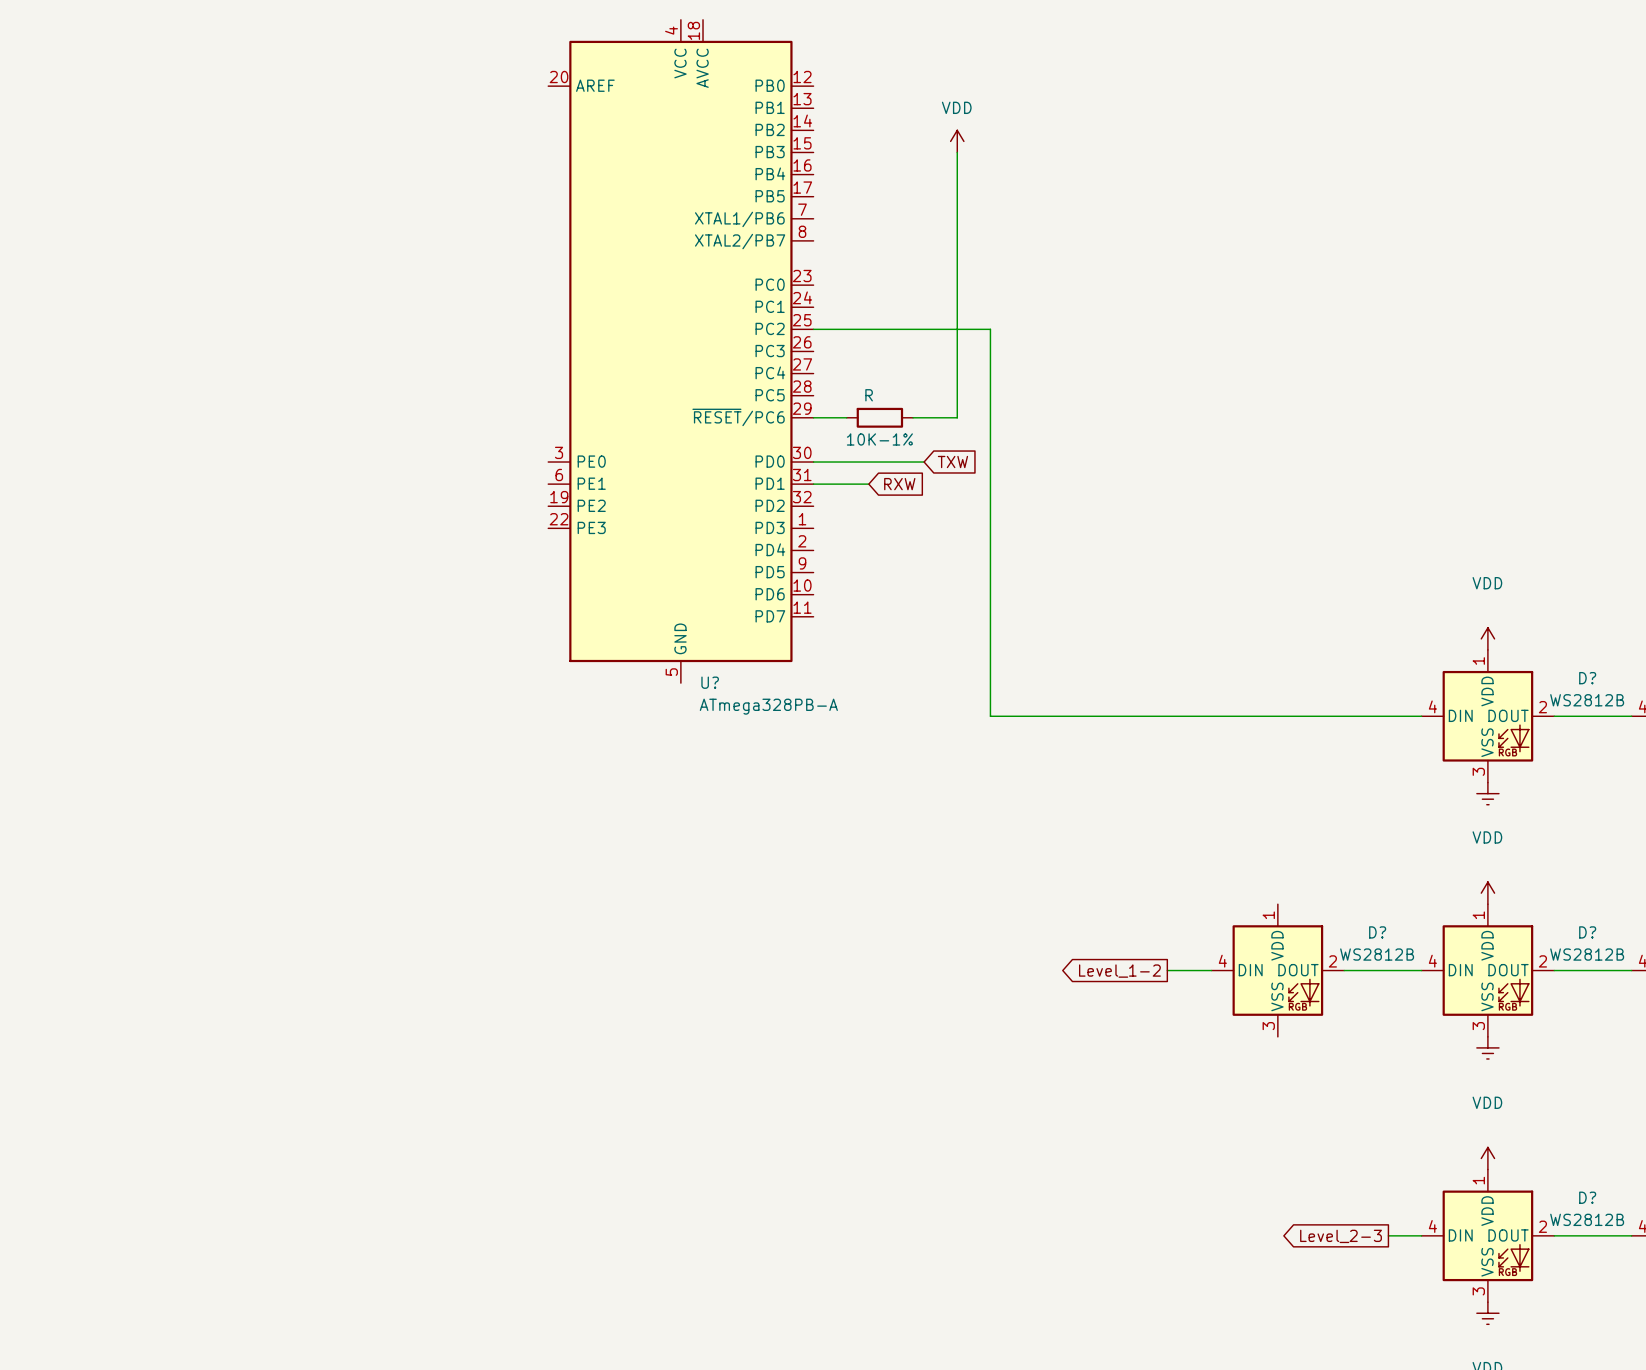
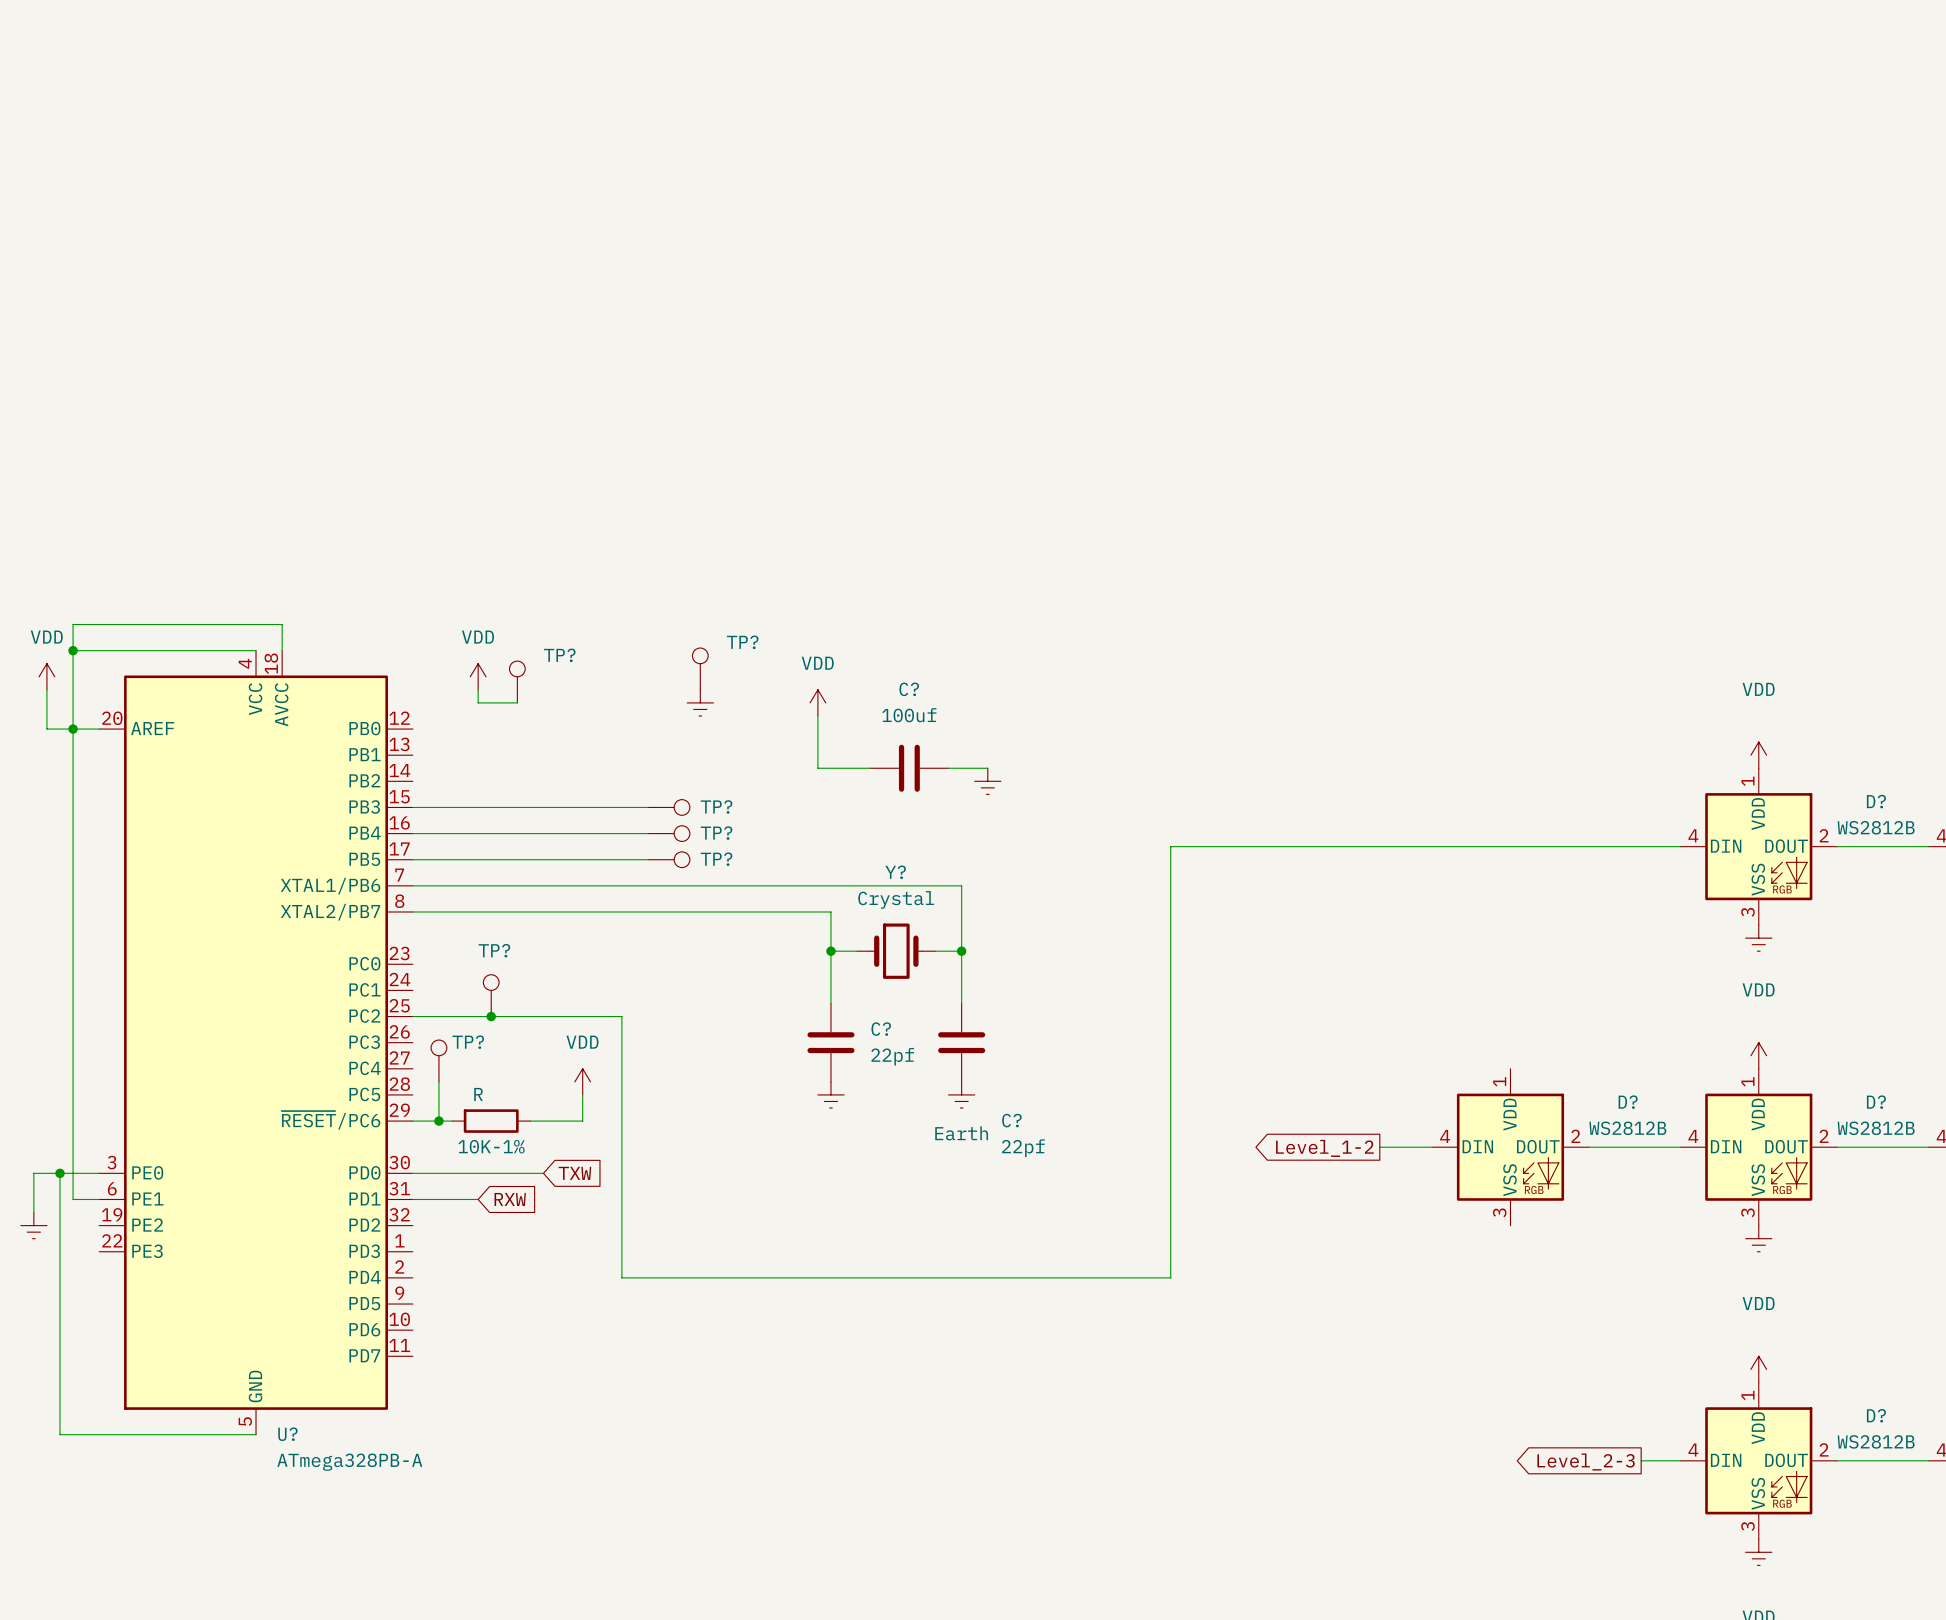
power symbol: VDD (957, 141) -> none
wire: (957, 152) (957, 417) (913, 417) -> none
wire: (813, 329) (990, 329) (990, 716) -> (412, 1016) (621, 1016) (621, 1277) (1170, 1277) (1170, 846)
U?: ATmega328PB-A (680, 351) -> none
wire: (813, 417) (846, 417) -> none
10K-1% position: (879, 417) -> (491, 1121)
wire: (813, 462) (924, 462) -> none
global label: TXW (952, 462) -> none
wire: (813, 484) (868, 484) -> none
global label: RXW (899, 484) -> none
wire: none -> (73, 650) (256, 650)
junction: none -> (73, 650)
wire: none -> (282, 650) (282, 624) (73, 624) (73, 1199) (99, 1199)
TP?: none -> (700, 668)
power symbol: none -> VDD (46, 676)
power symbol: none -> VDD (478, 676)
TP?: none -> (517, 682)
wire: none -> (46, 689) (46, 729) (99, 729)
wire: none -> (478, 689) (478, 702) (517, 702)
power symbol: none -> (700, 702)
power symbol: none -> VDD (817, 702)
junction: none -> (73, 729)
C?: none -> 100uf (909, 768)
wire: none -> (948, 768) (987, 768)
power symbol: none -> (987, 781)
wire: none -> (412, 807) (648, 807)
TP?: none -> (668, 807)
wire: none -> (412, 833) (648, 833)
TP?: none -> (668, 833)
wire: none -> (412, 859) (648, 859)
TP?: none -> (668, 859)
wire: none -> (412, 885) (961, 885) (961, 1003)
wire: none -> (412, 911) (830, 911) (830, 1003)
wire: none -> (830, 951) (857, 951)
junction: none -> (830, 951)
Y?: none -> Crystal (896, 951)
wire: none -> (935, 951) (961, 951)
junction: none -> (961, 951)
TP?: none -> (491, 995)
junction: none -> (491, 1016)
U?: none -> ATmega328PB-A (256, 1042)
C?: none -> 22pf (830, 1042)
C?: none -> 22pf (961, 1042)
TP?: none -> (438, 1060)
wire: none -> (438, 1081) (438, 1121)
power symbol: none -> VDD (582, 1081)
wire: none -> (582, 1094) (582, 1121) (530, 1121)
power symbol: none -> (830, 1094)
power symbol: none -> Earth (961, 1094)
wire: none -> (412, 1121) (452, 1121)
junction: none -> (438, 1121)
wire: none -> (60, 1173) (60, 1434) (256, 1434)
junction: none -> (60, 1173)
wire: none -> (99, 1173) (33, 1173) (33, 1212)
wire: none -> (412, 1173) (543, 1173)
global label: none -> TXW (574, 1173)
wire: none -> (412, 1199) (478, 1199)
global label: none -> RXW (510, 1199)
power symbol: none -> (33, 1225)

